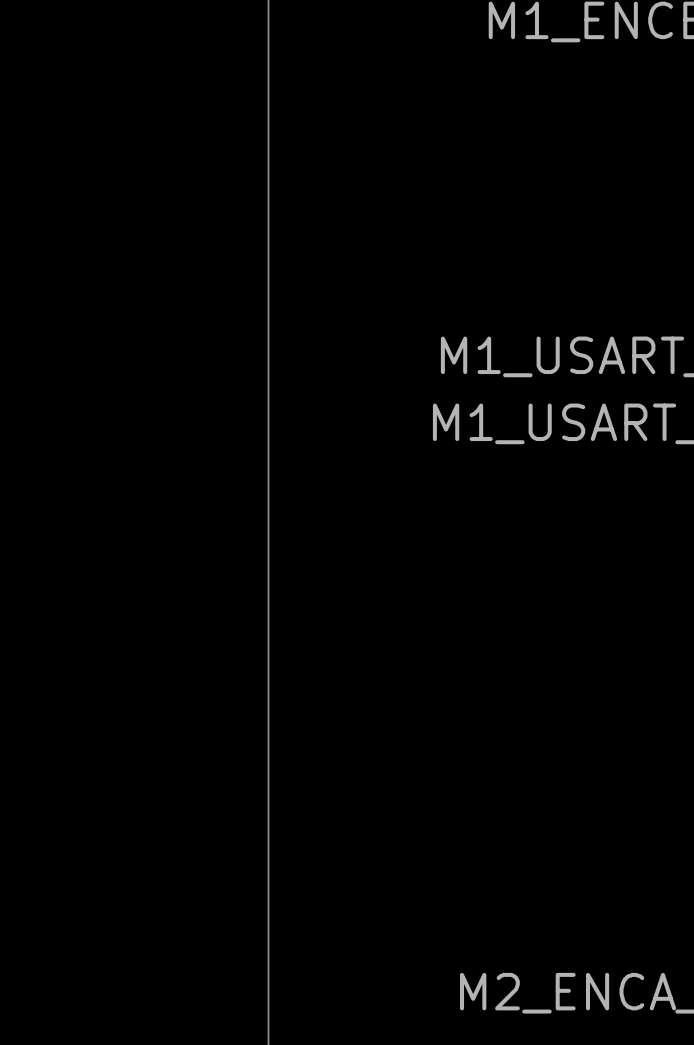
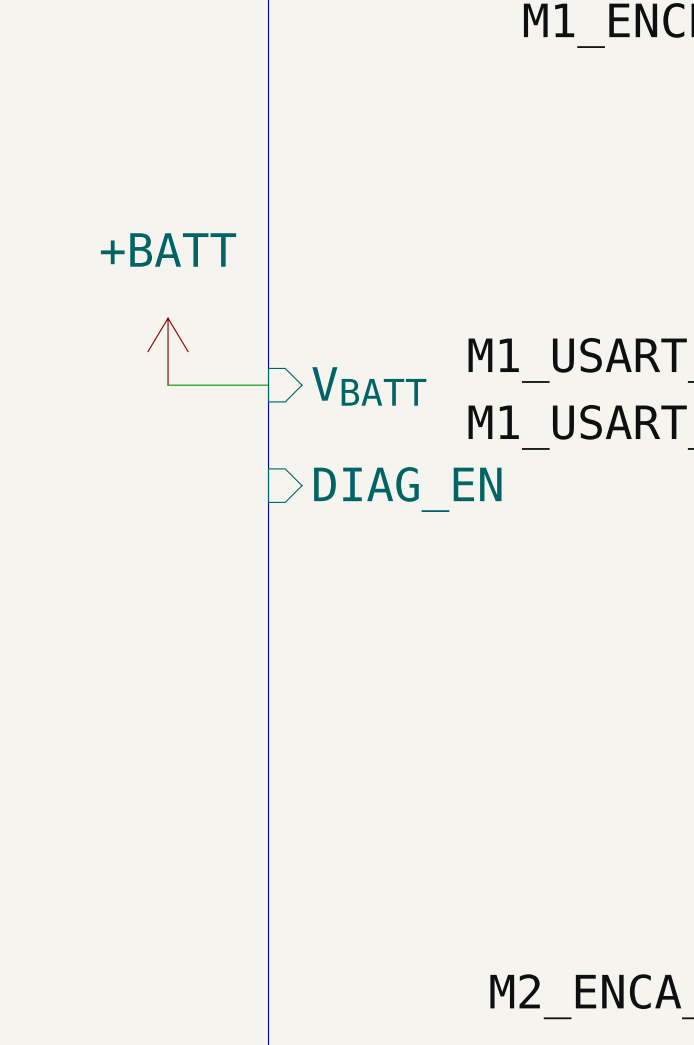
power symbol: none -> +BATT (168, 351)
wire: none -> (168, 385) (268, 385)
sheet pin: none -> VBATT (369, 386)
sheet pin: none -> DIAG_EN (407, 489)

